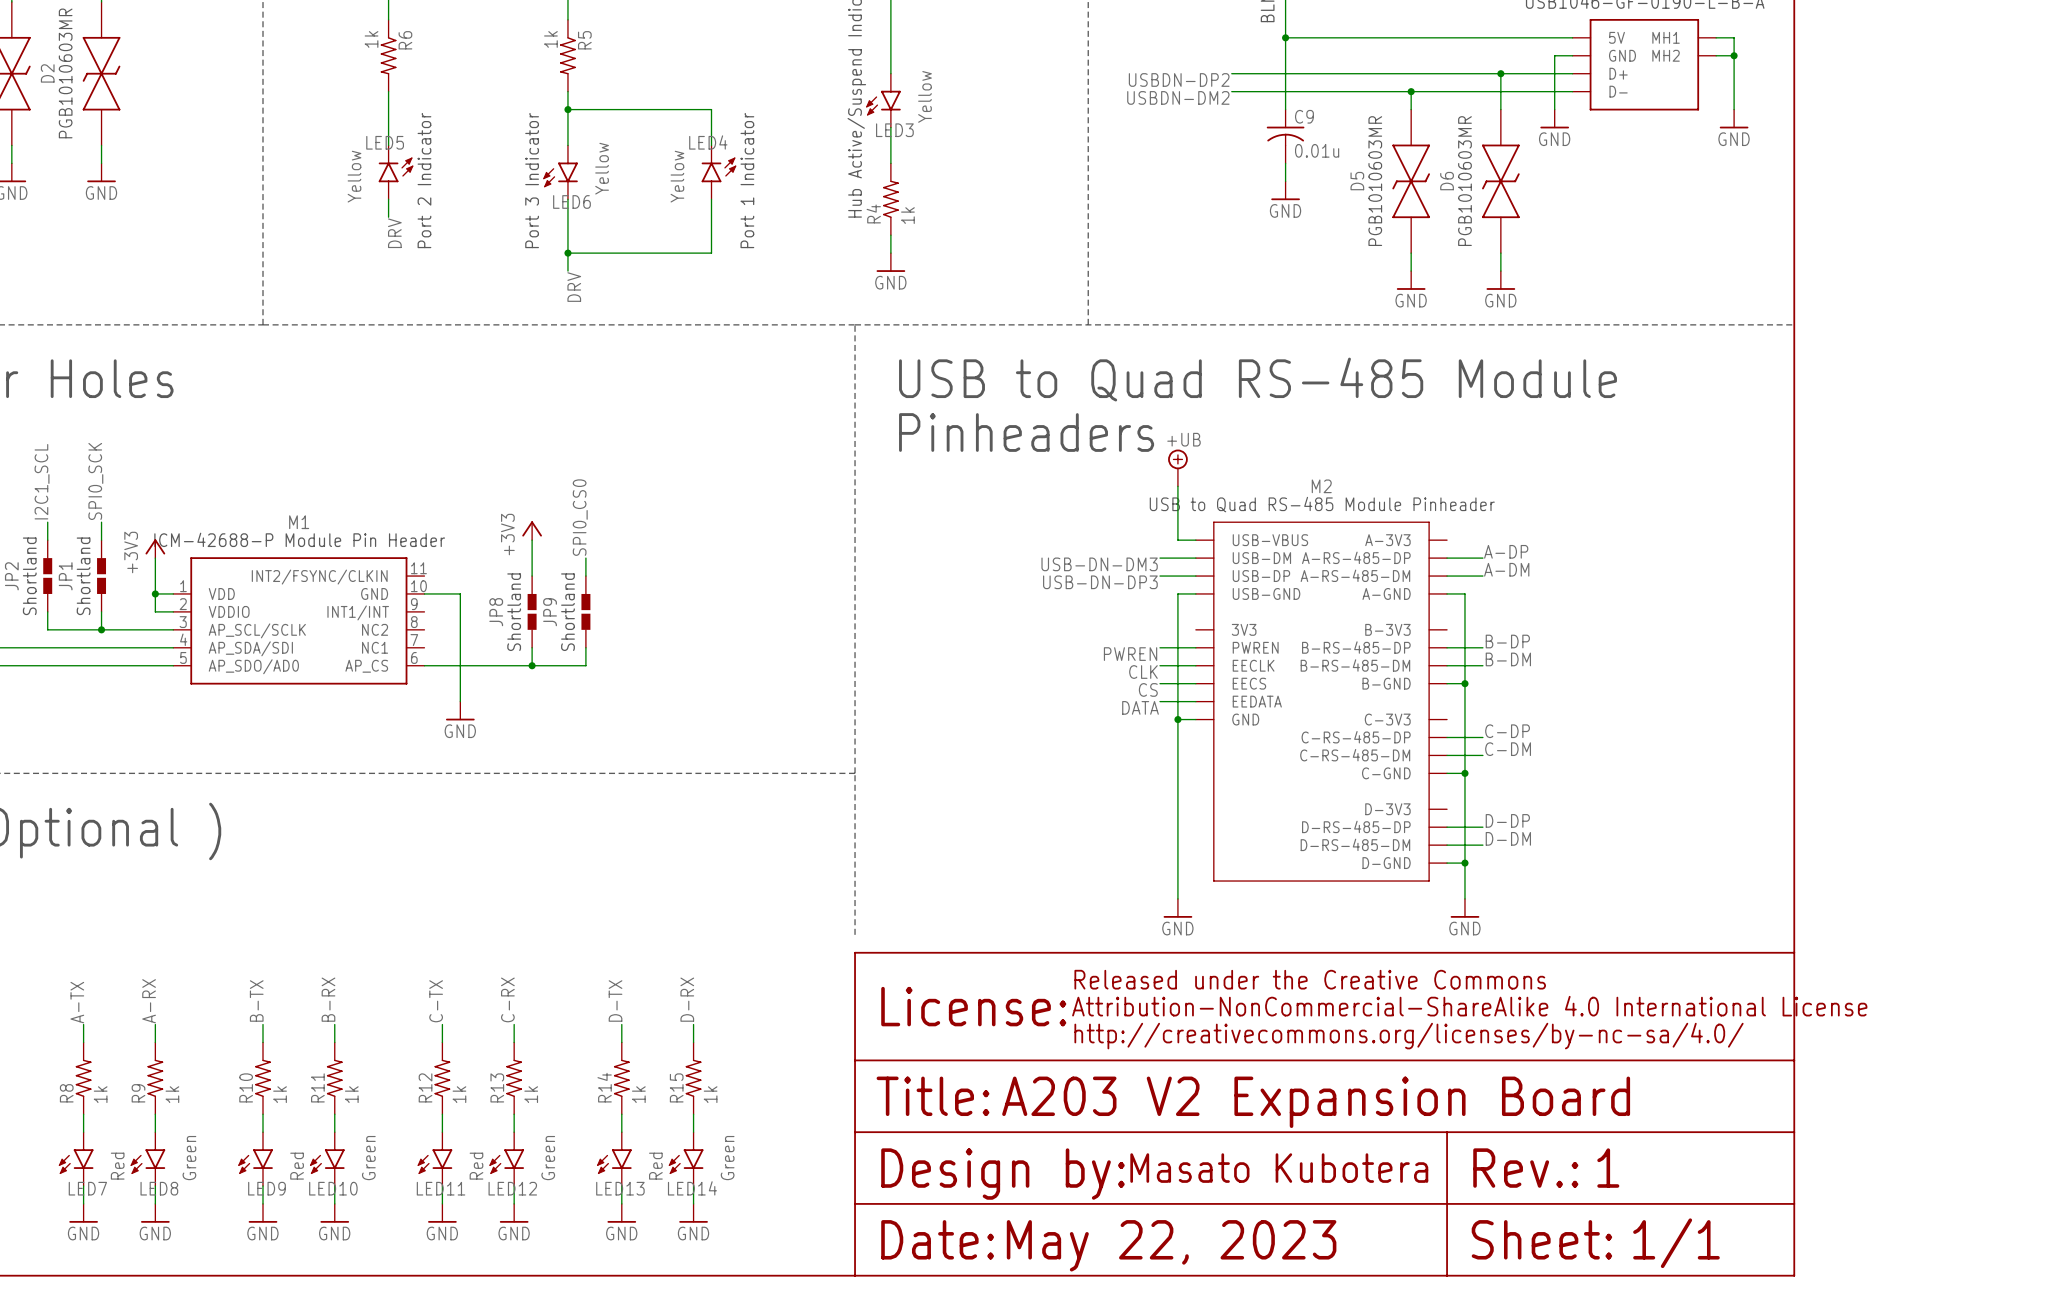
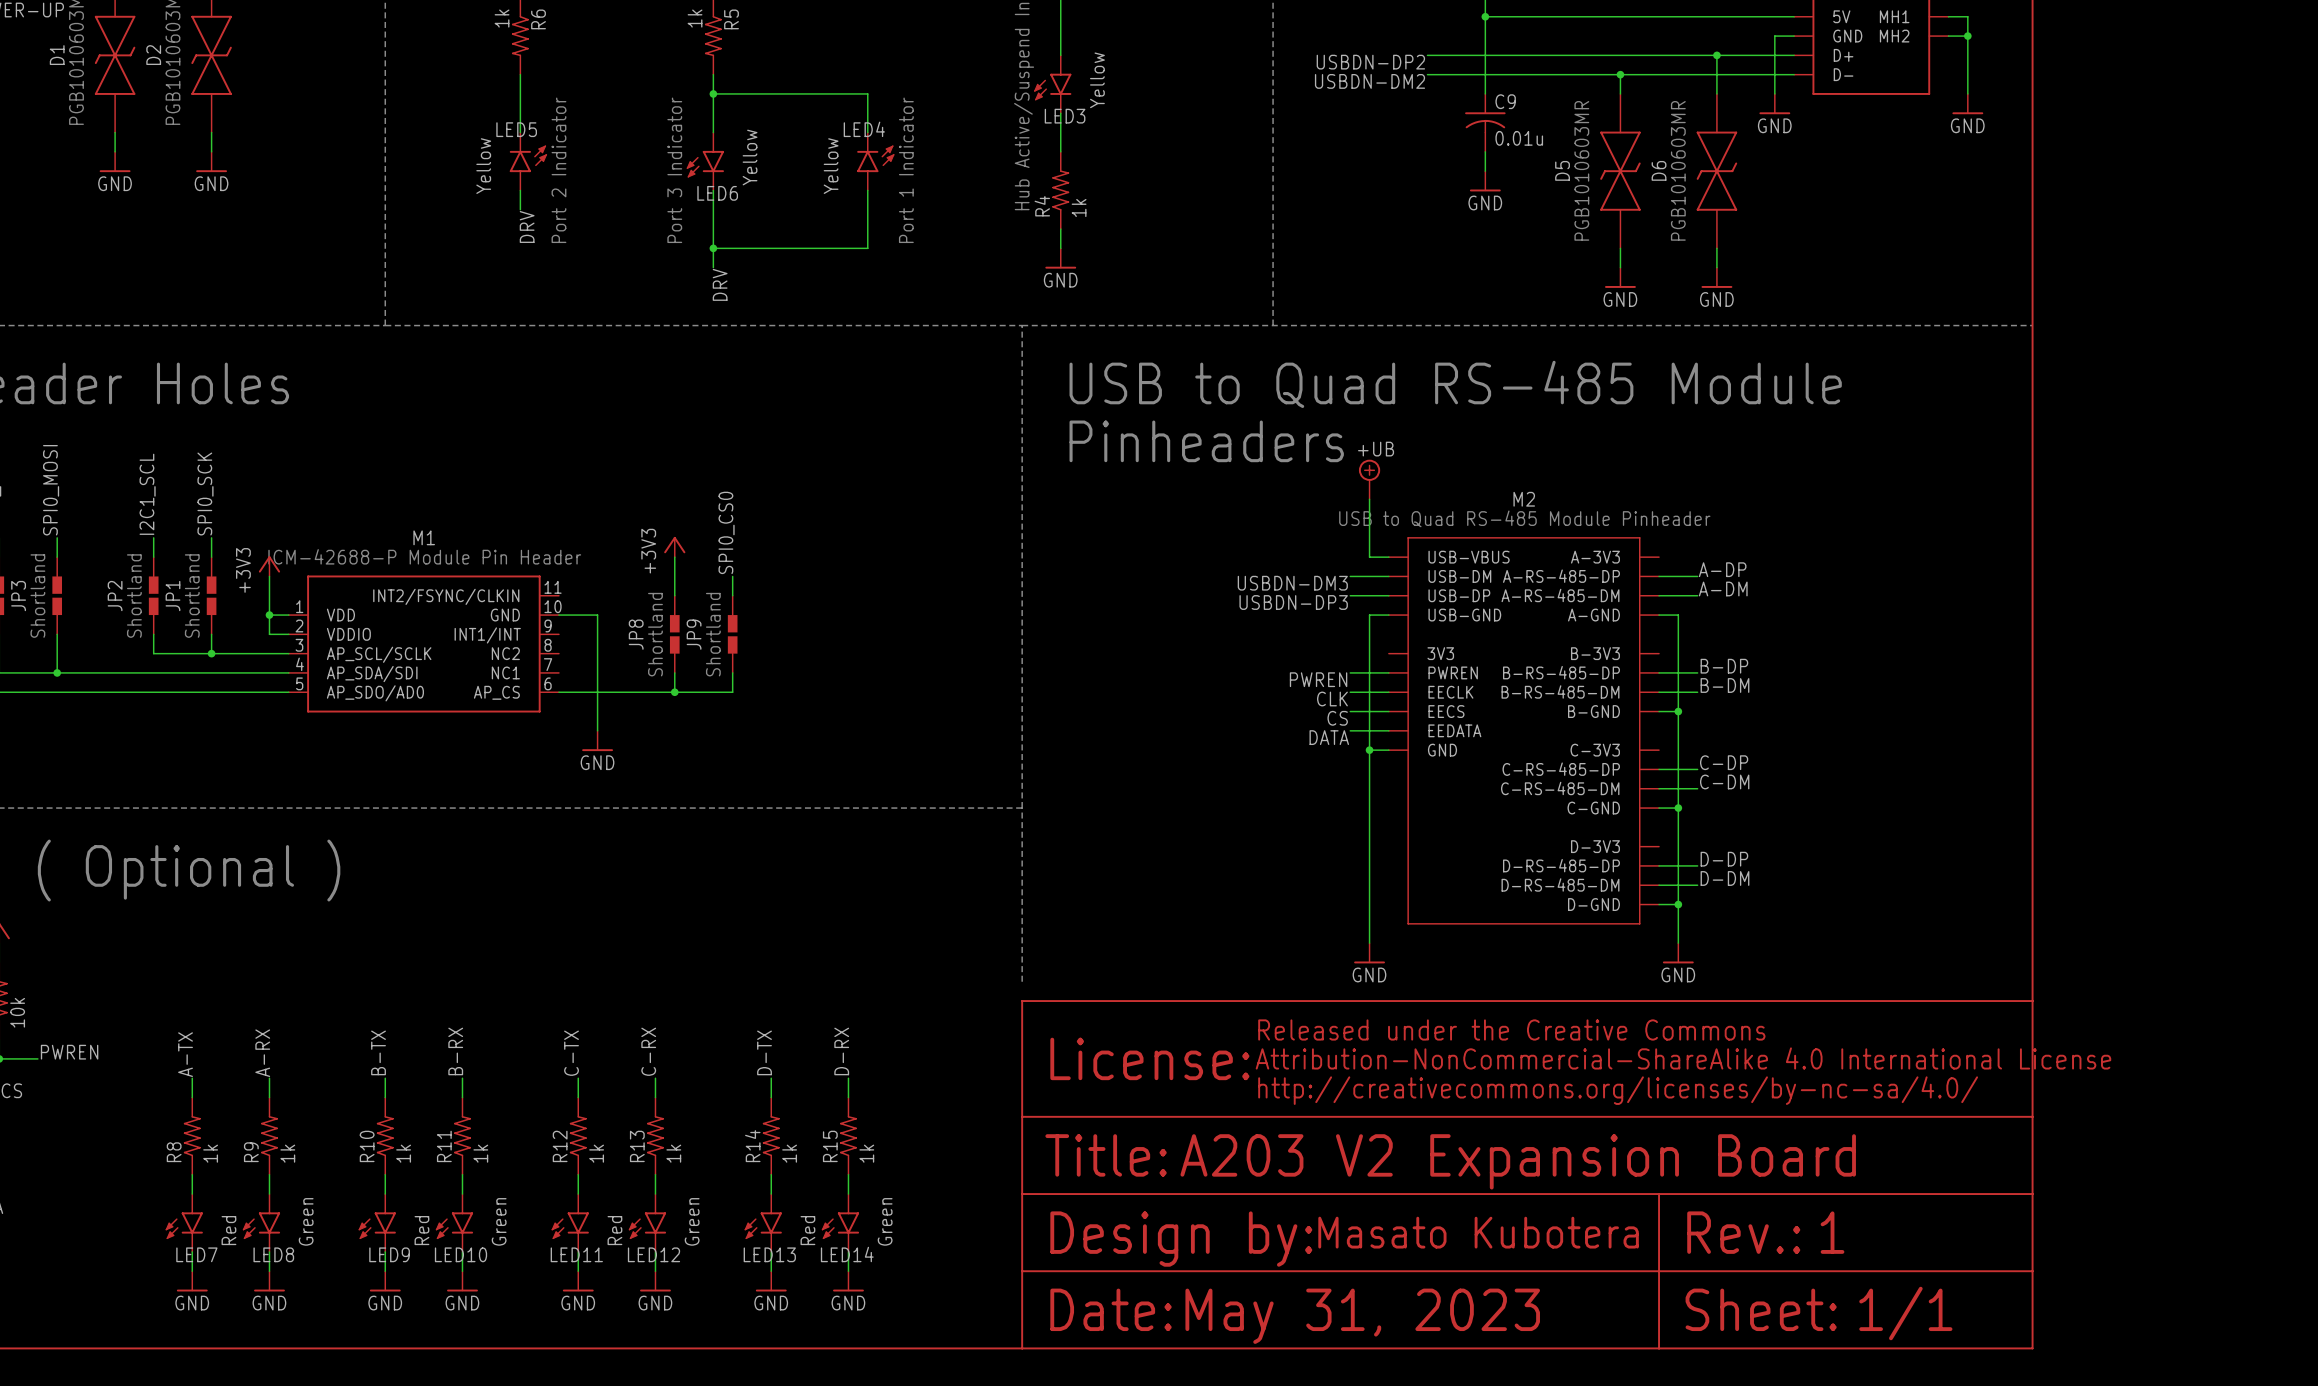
label: USB-DN-DM3 (1099, 564) -> USBDN-DM3 (1292, 583)
label: USB-DN-DP3 (1100, 582) -> USBDN-DP3 (1293, 602)
text: May 22, 2023 (1171, 1245) -> May 31, 2023 (1362, 1316)

